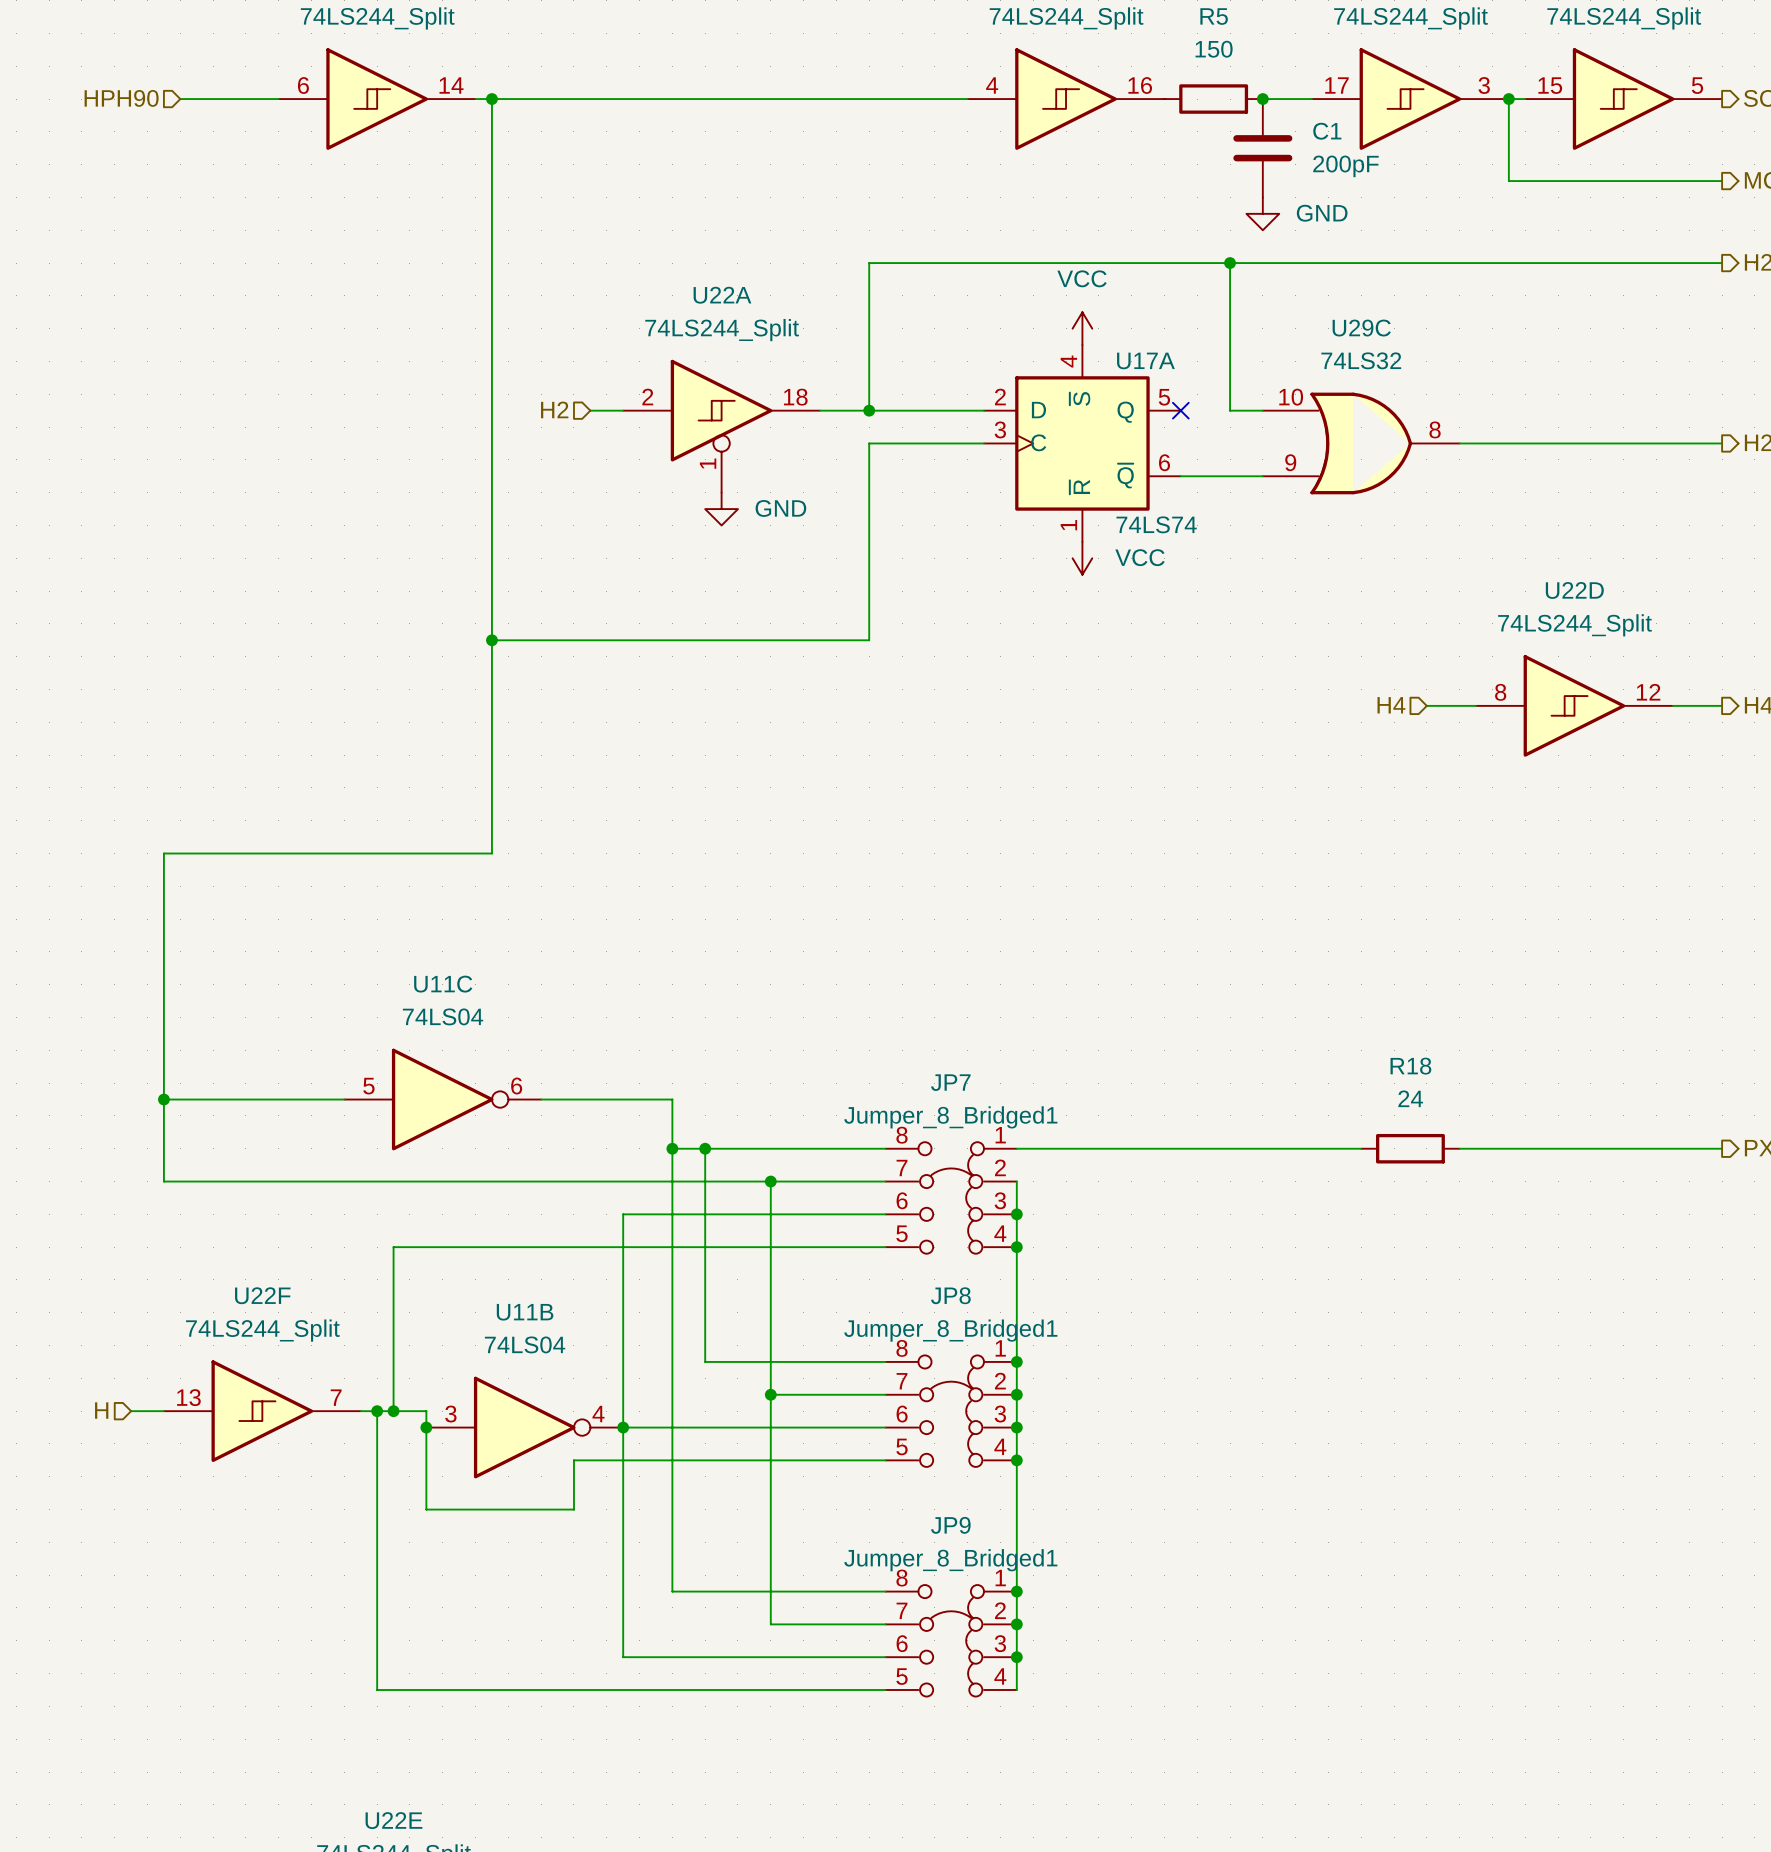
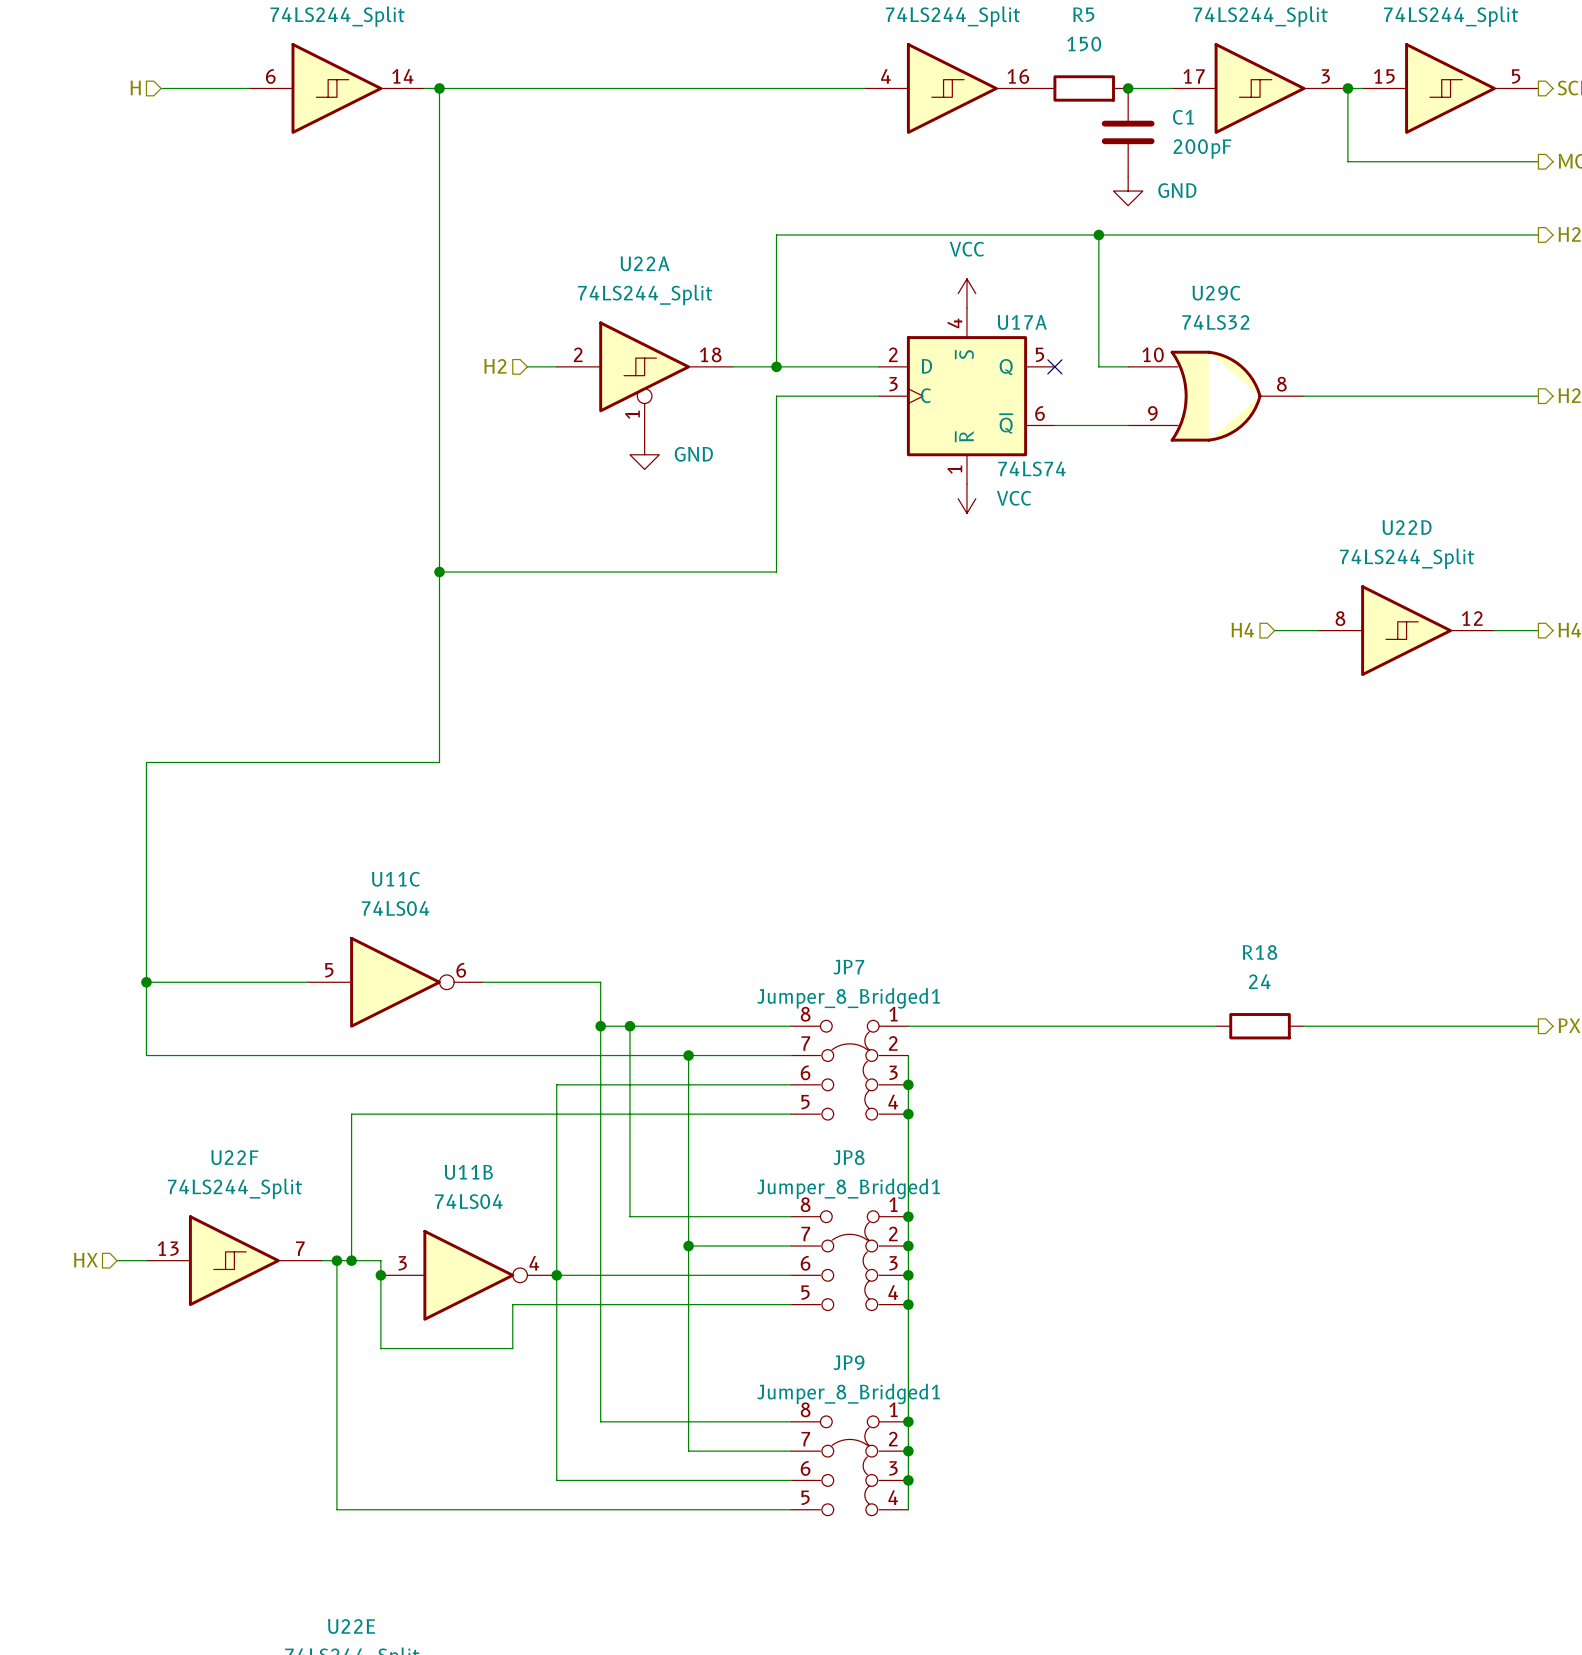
hierarchical label: HPH90 (121, 98) -> H (135, 87)
hierarchical label: H (101, 1410) -> HX (85, 1260)

